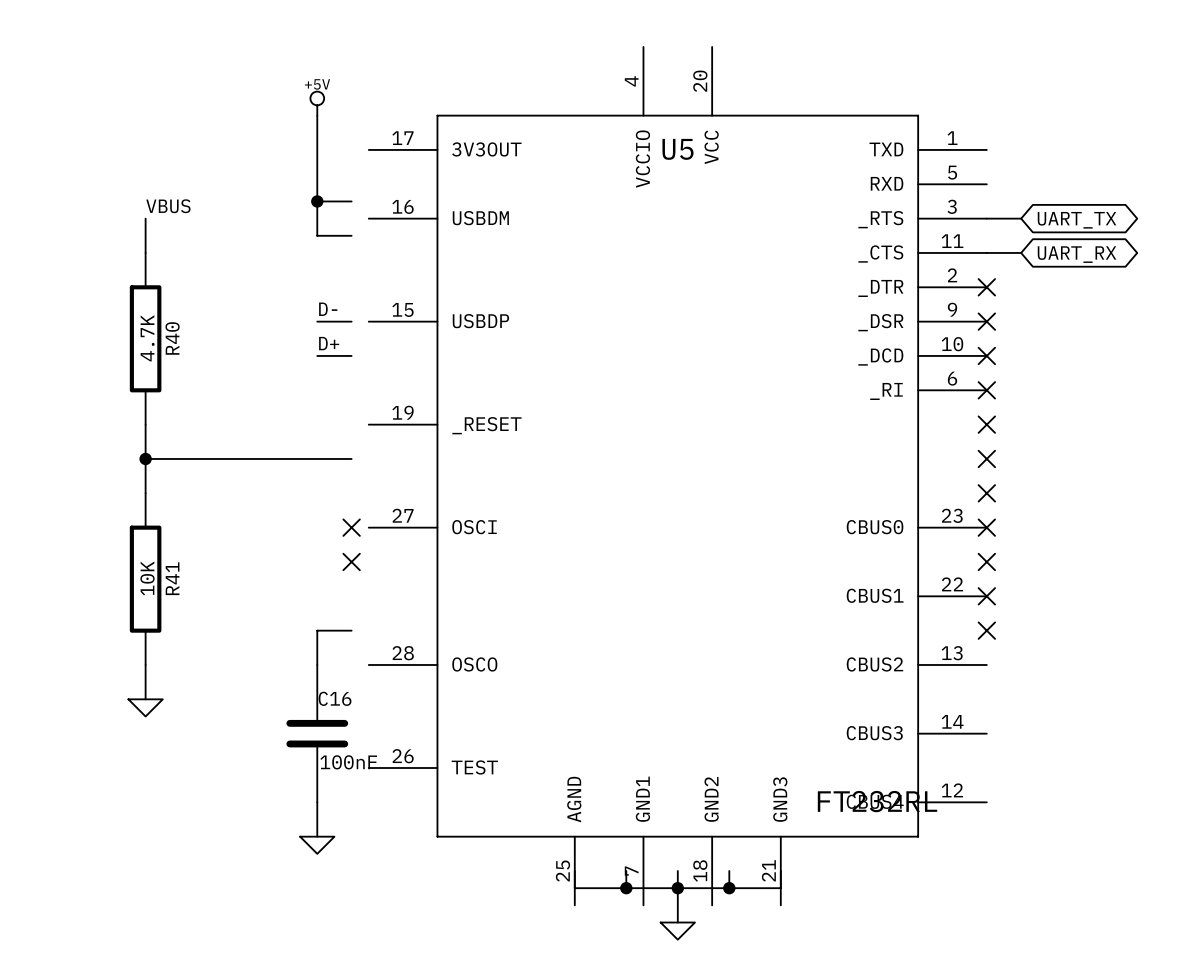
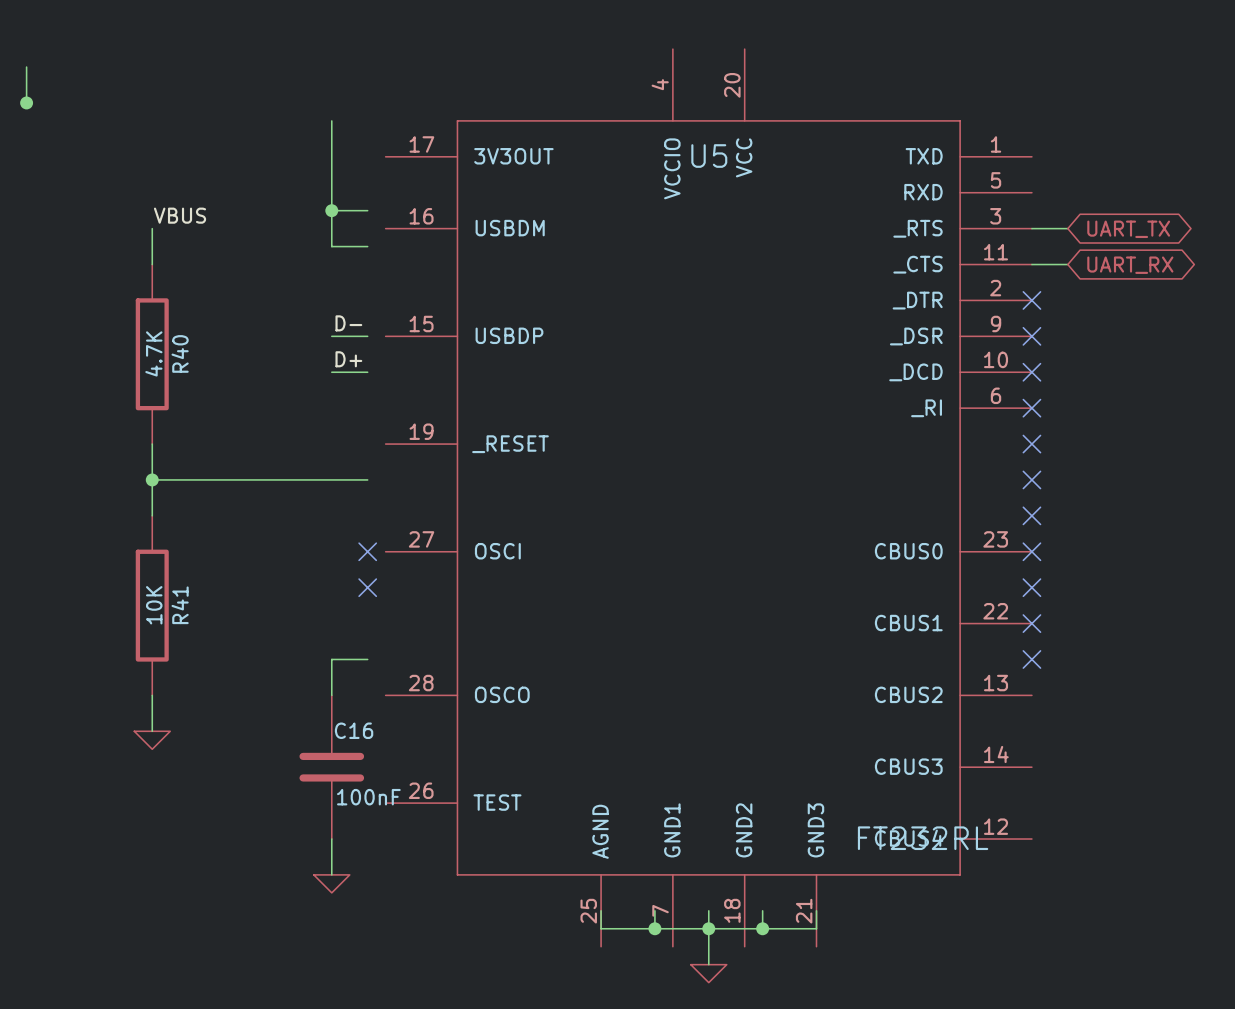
wire: none -> (26, 67) (26, 102)
junction: none -> (26, 102)
power symbol: +5V (317, 103) -> none

